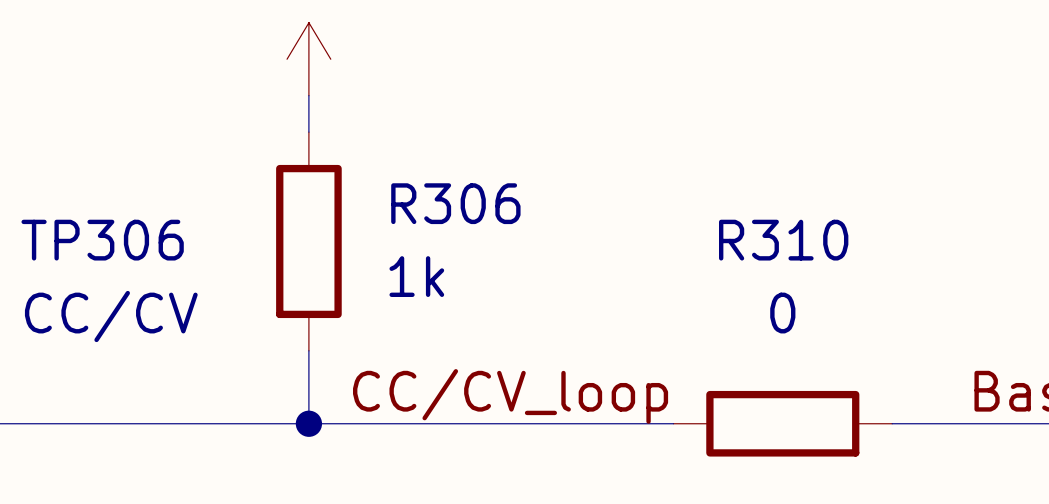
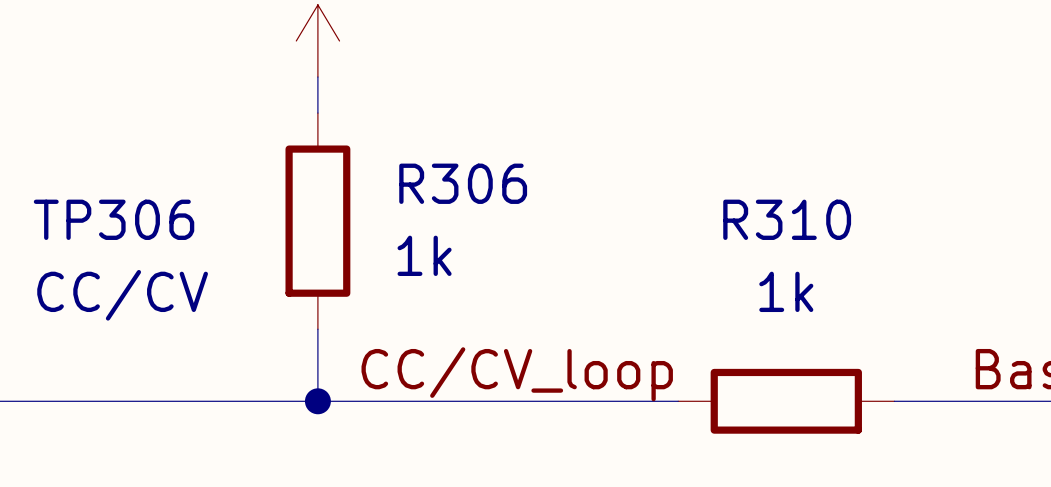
R310 value: 0 (782, 313) -> 1k (786, 291)

